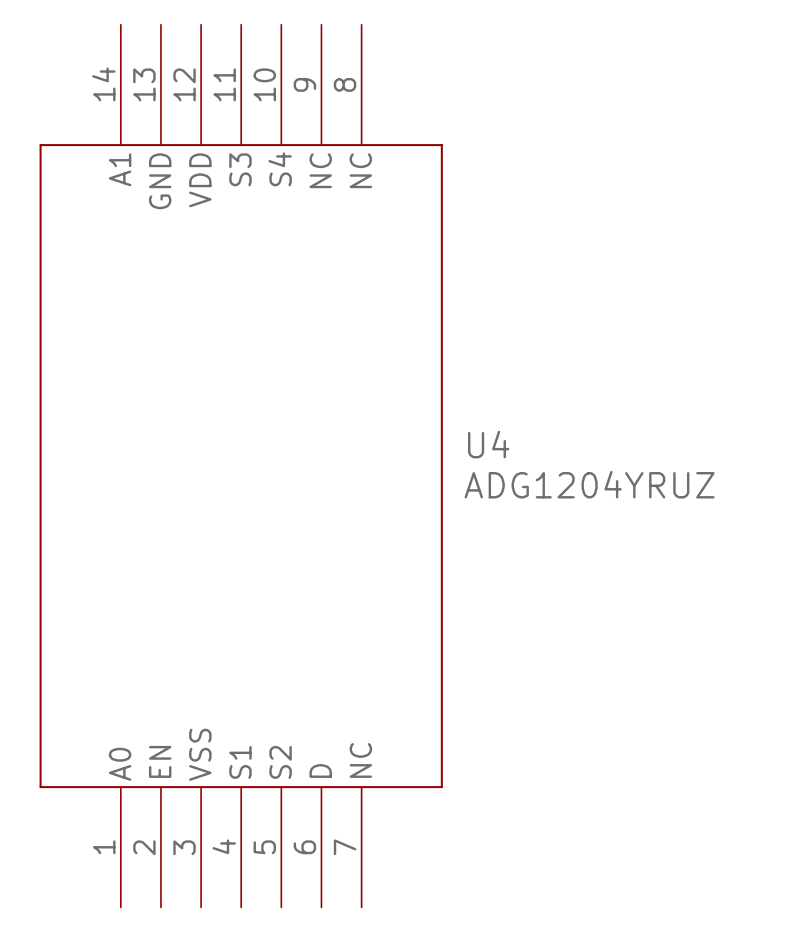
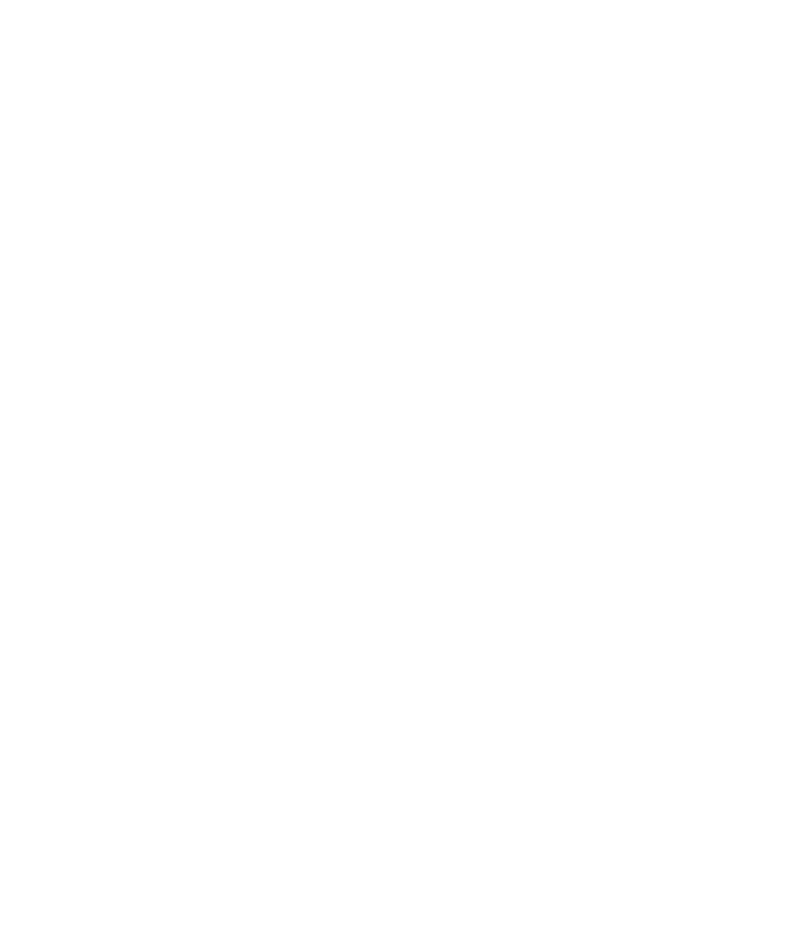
U4: ADG1204YRUZ (241, 466) -> none

